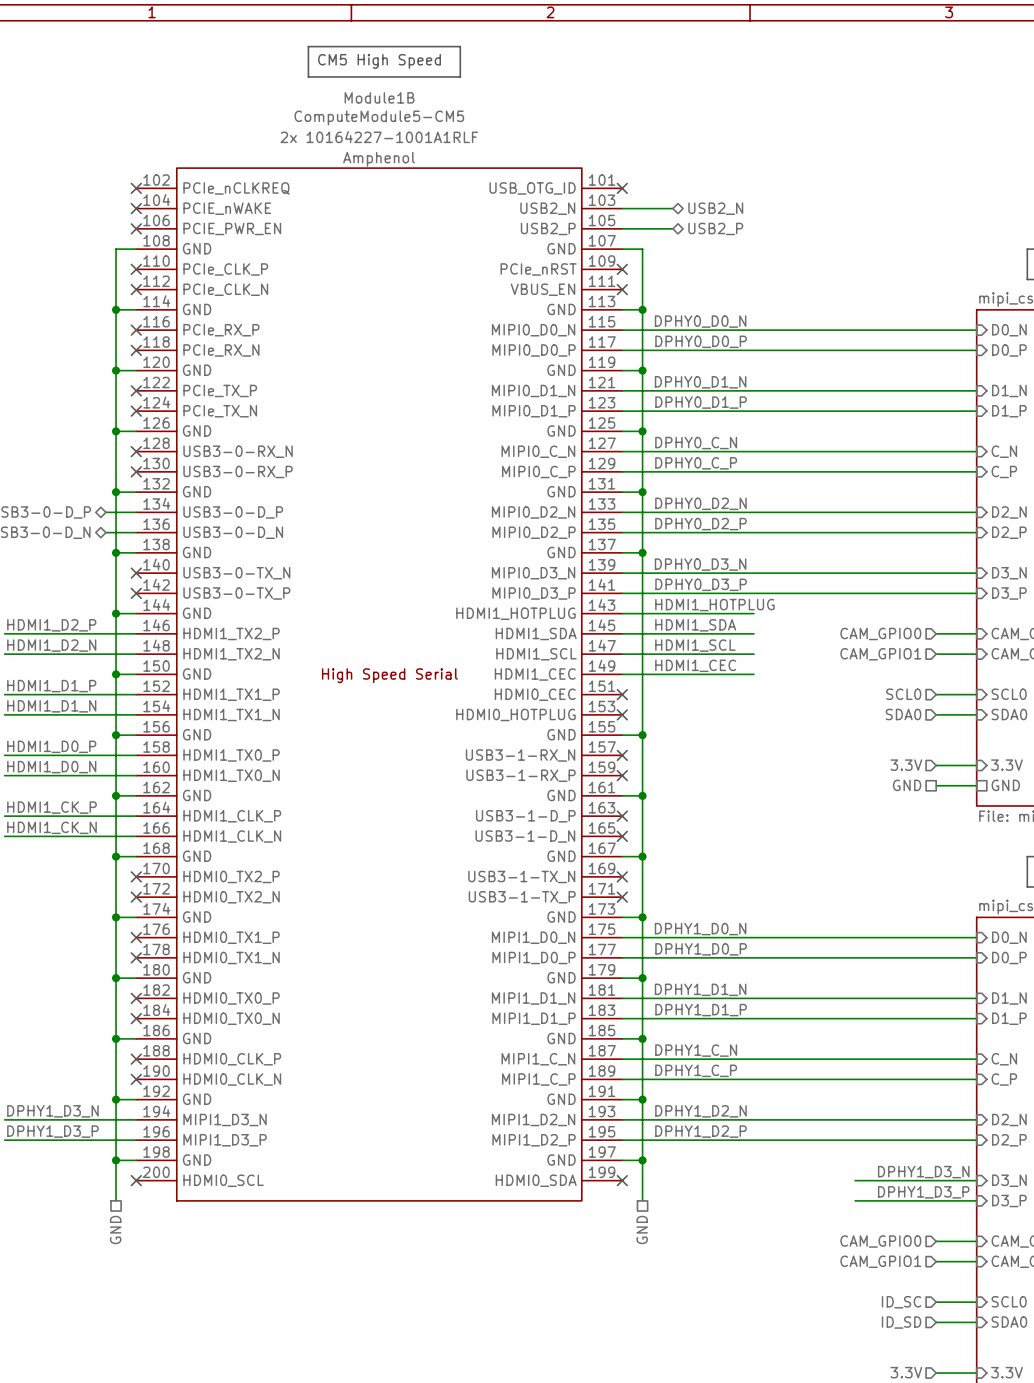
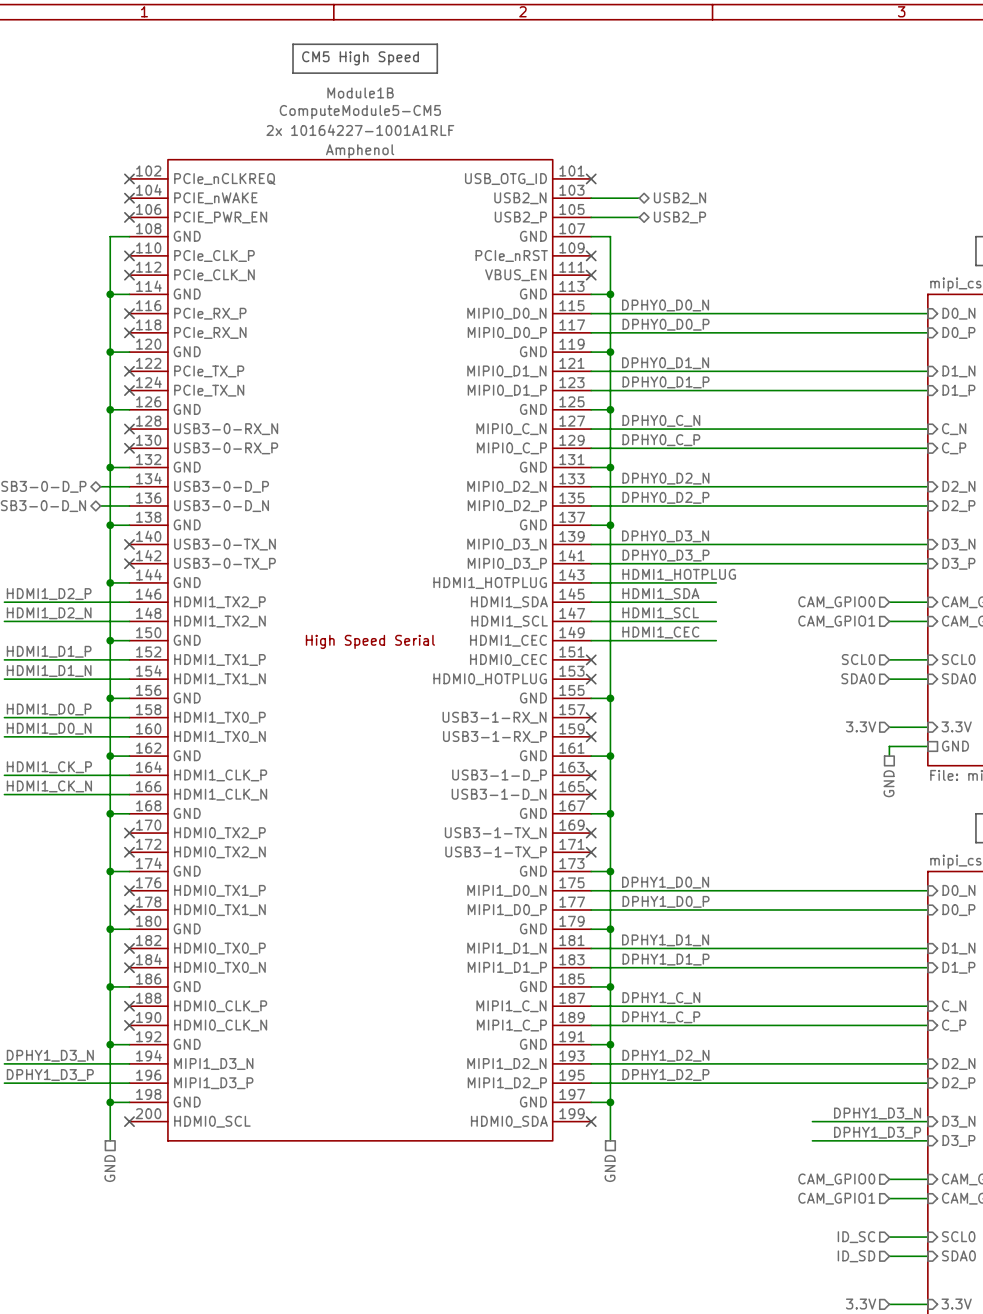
hierarchical label rotation: 0° (907, 785) -> 90° counterclockwise (889, 783)
hierarchical label position: GND (907, 785) -> GND (889, 783)

